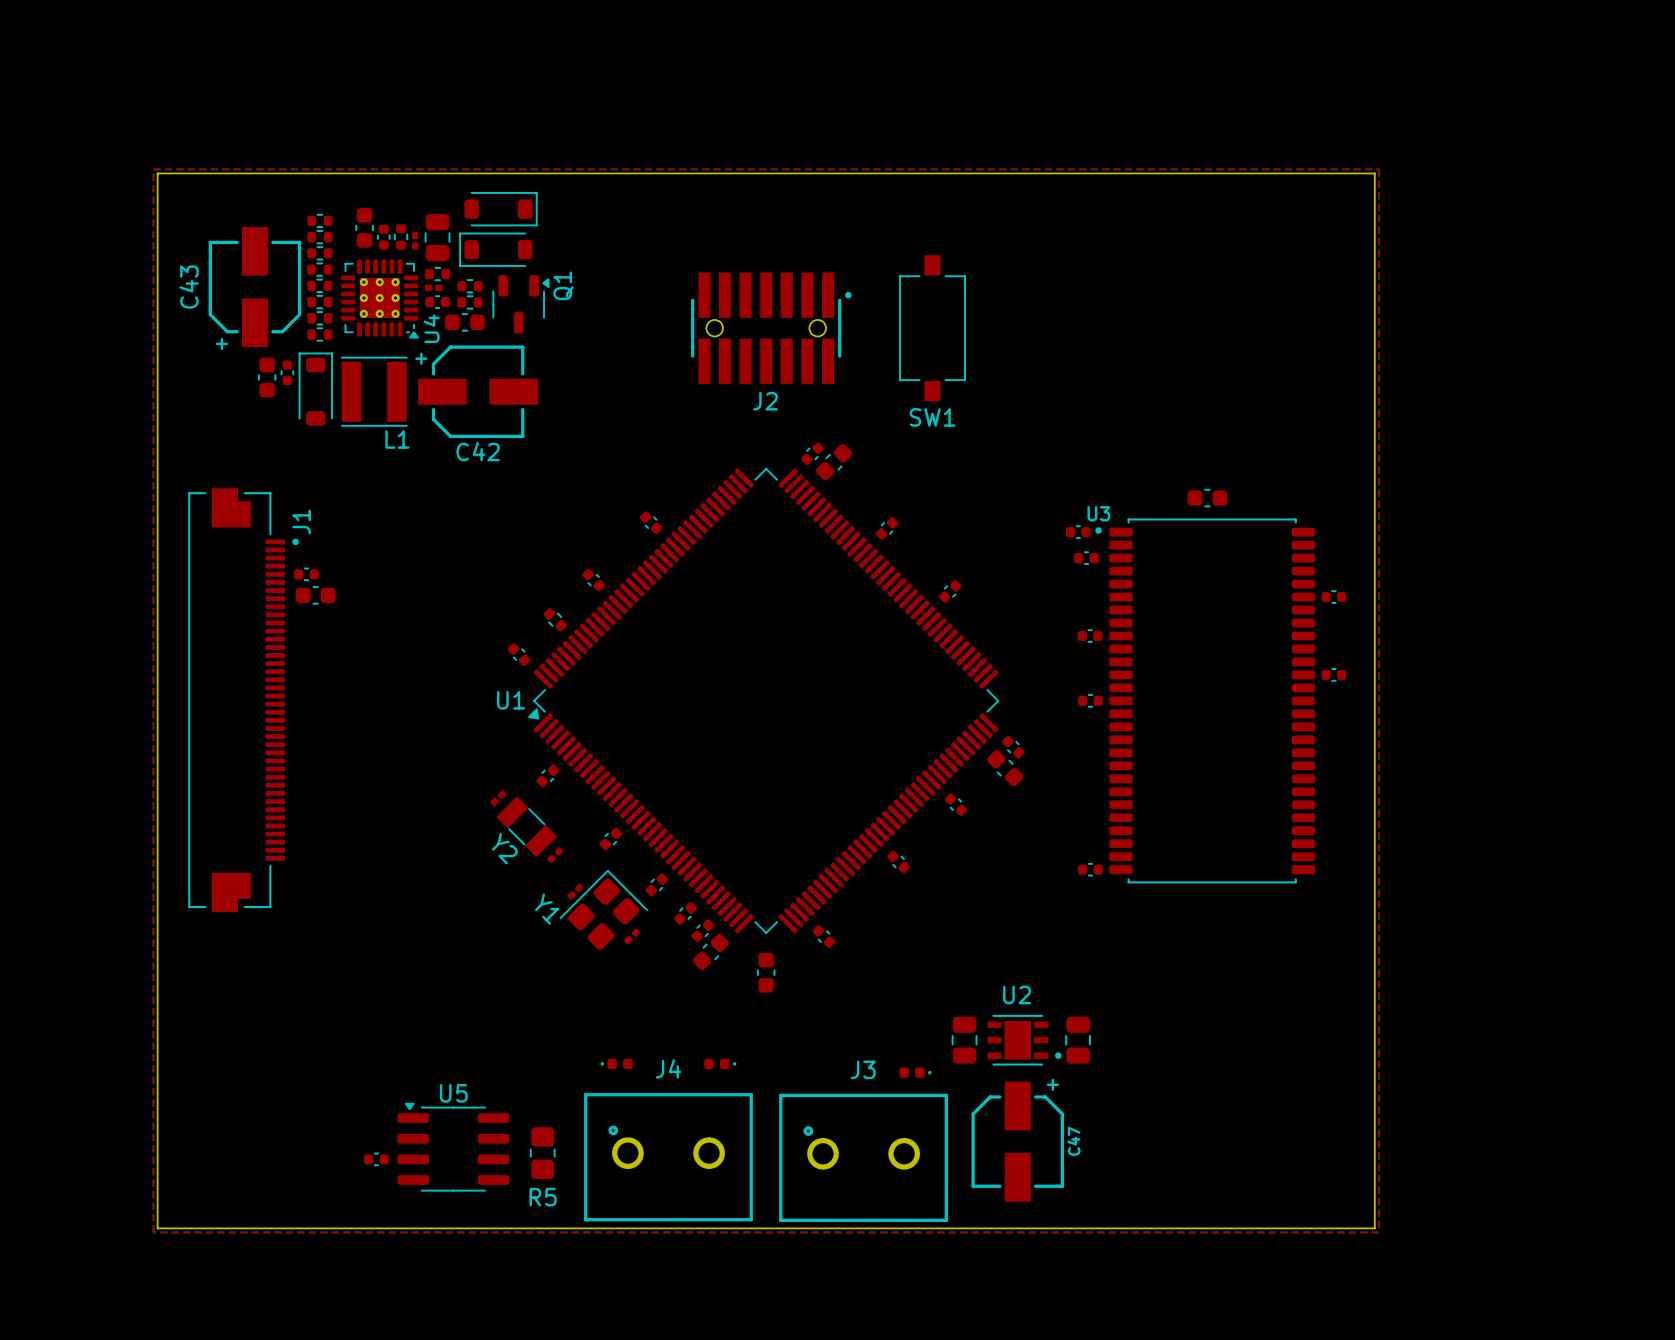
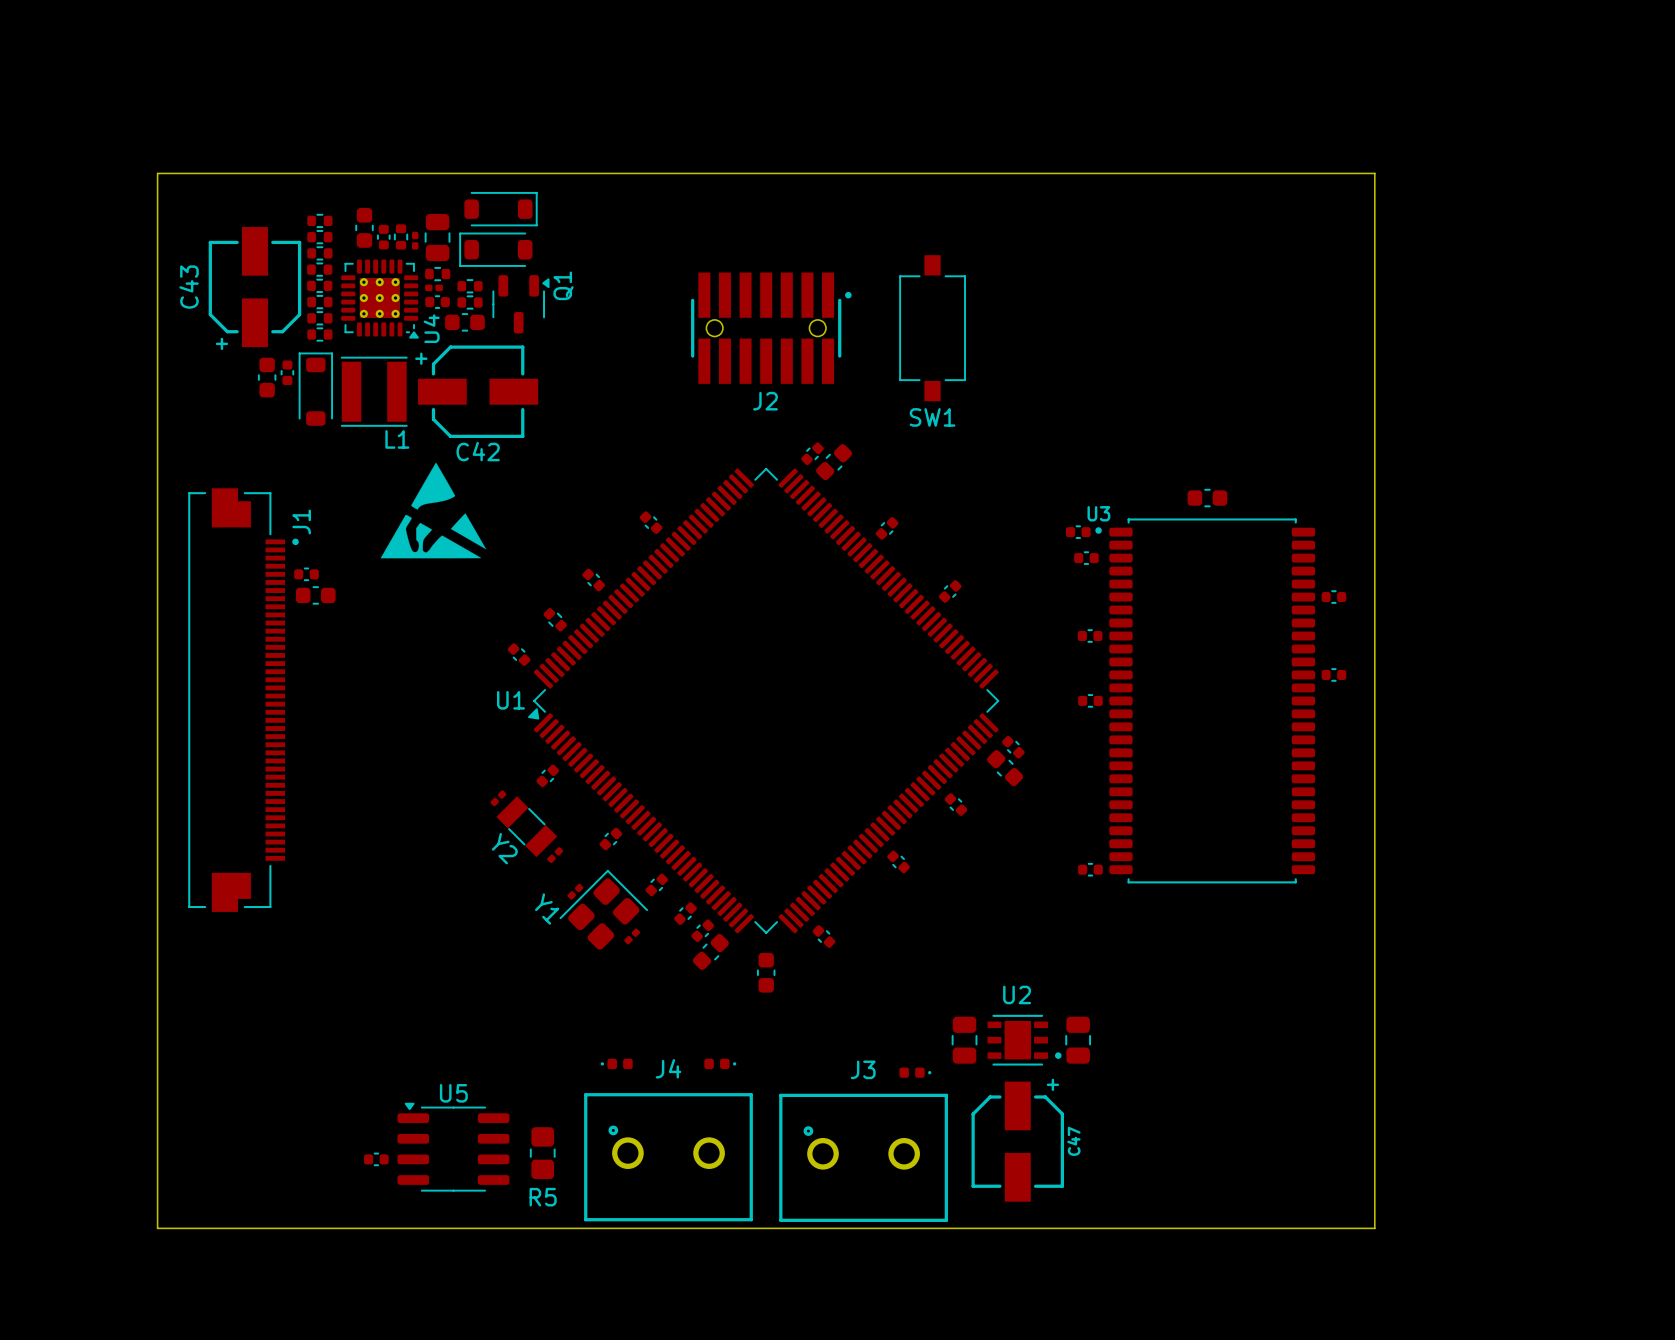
top zone outline: (153, 169) (1378, 169) (1378, 1232) (153, 1232) (153, 169) -> none
drawing: none -> [380, 462, 487, 559]

